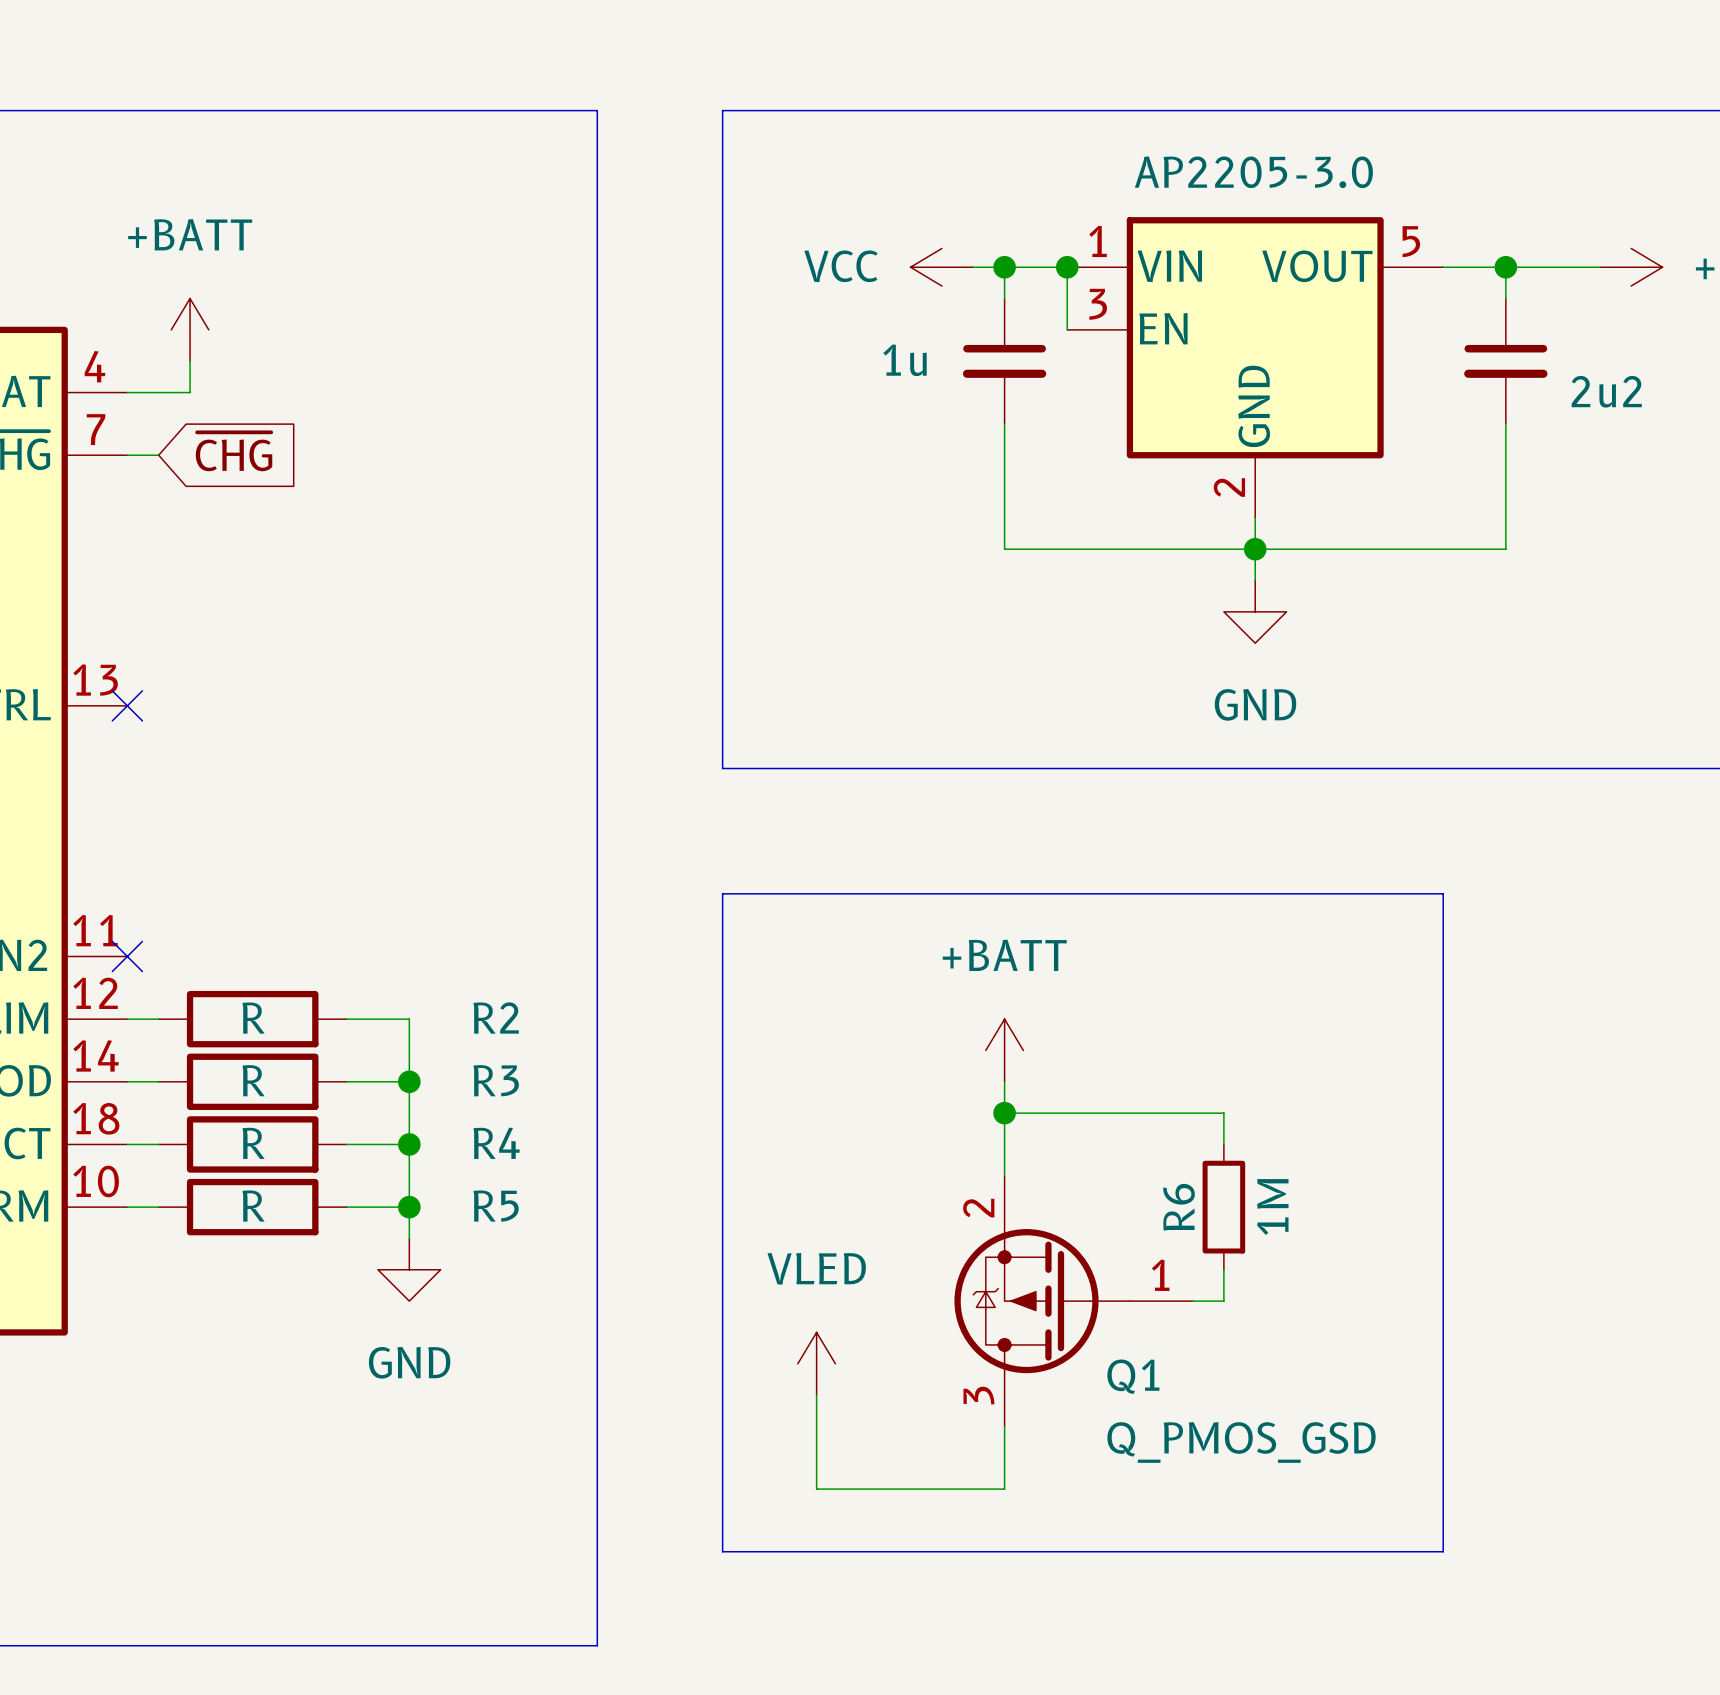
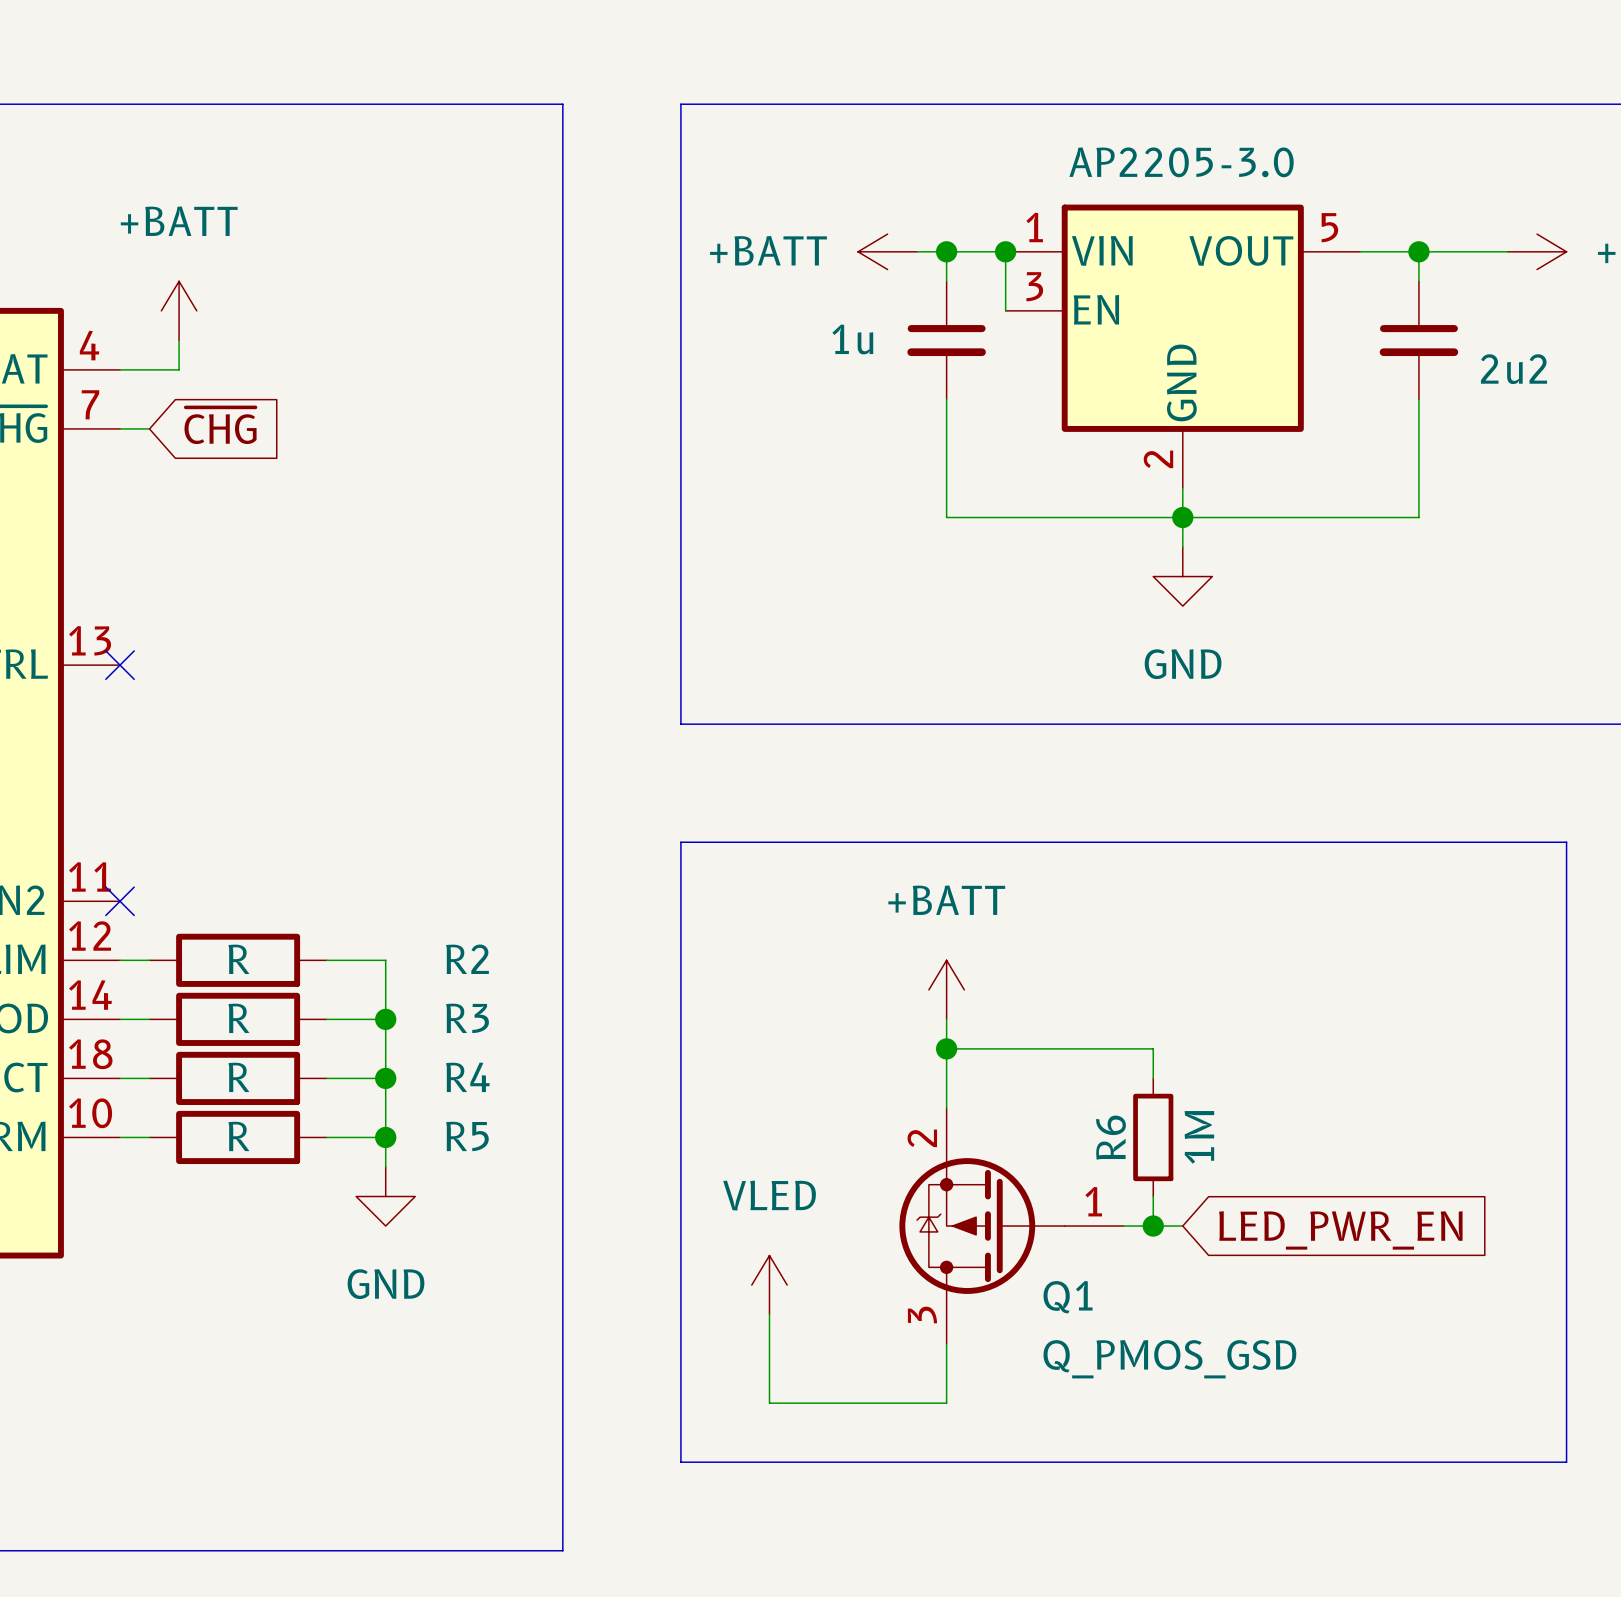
power symbol: VCC (941, 267) -> +BATT (887, 251)
line: (1443, 893) (1443, 1551) -> (1359, 842) (1566, 842) (1566, 1462) (1359, 1462)
wire: none -> (1153, 1226) (1182, 1226)
junction: none -> (1153, 1226)
global label: none -> LED_PWR_EN (1340, 1230)

